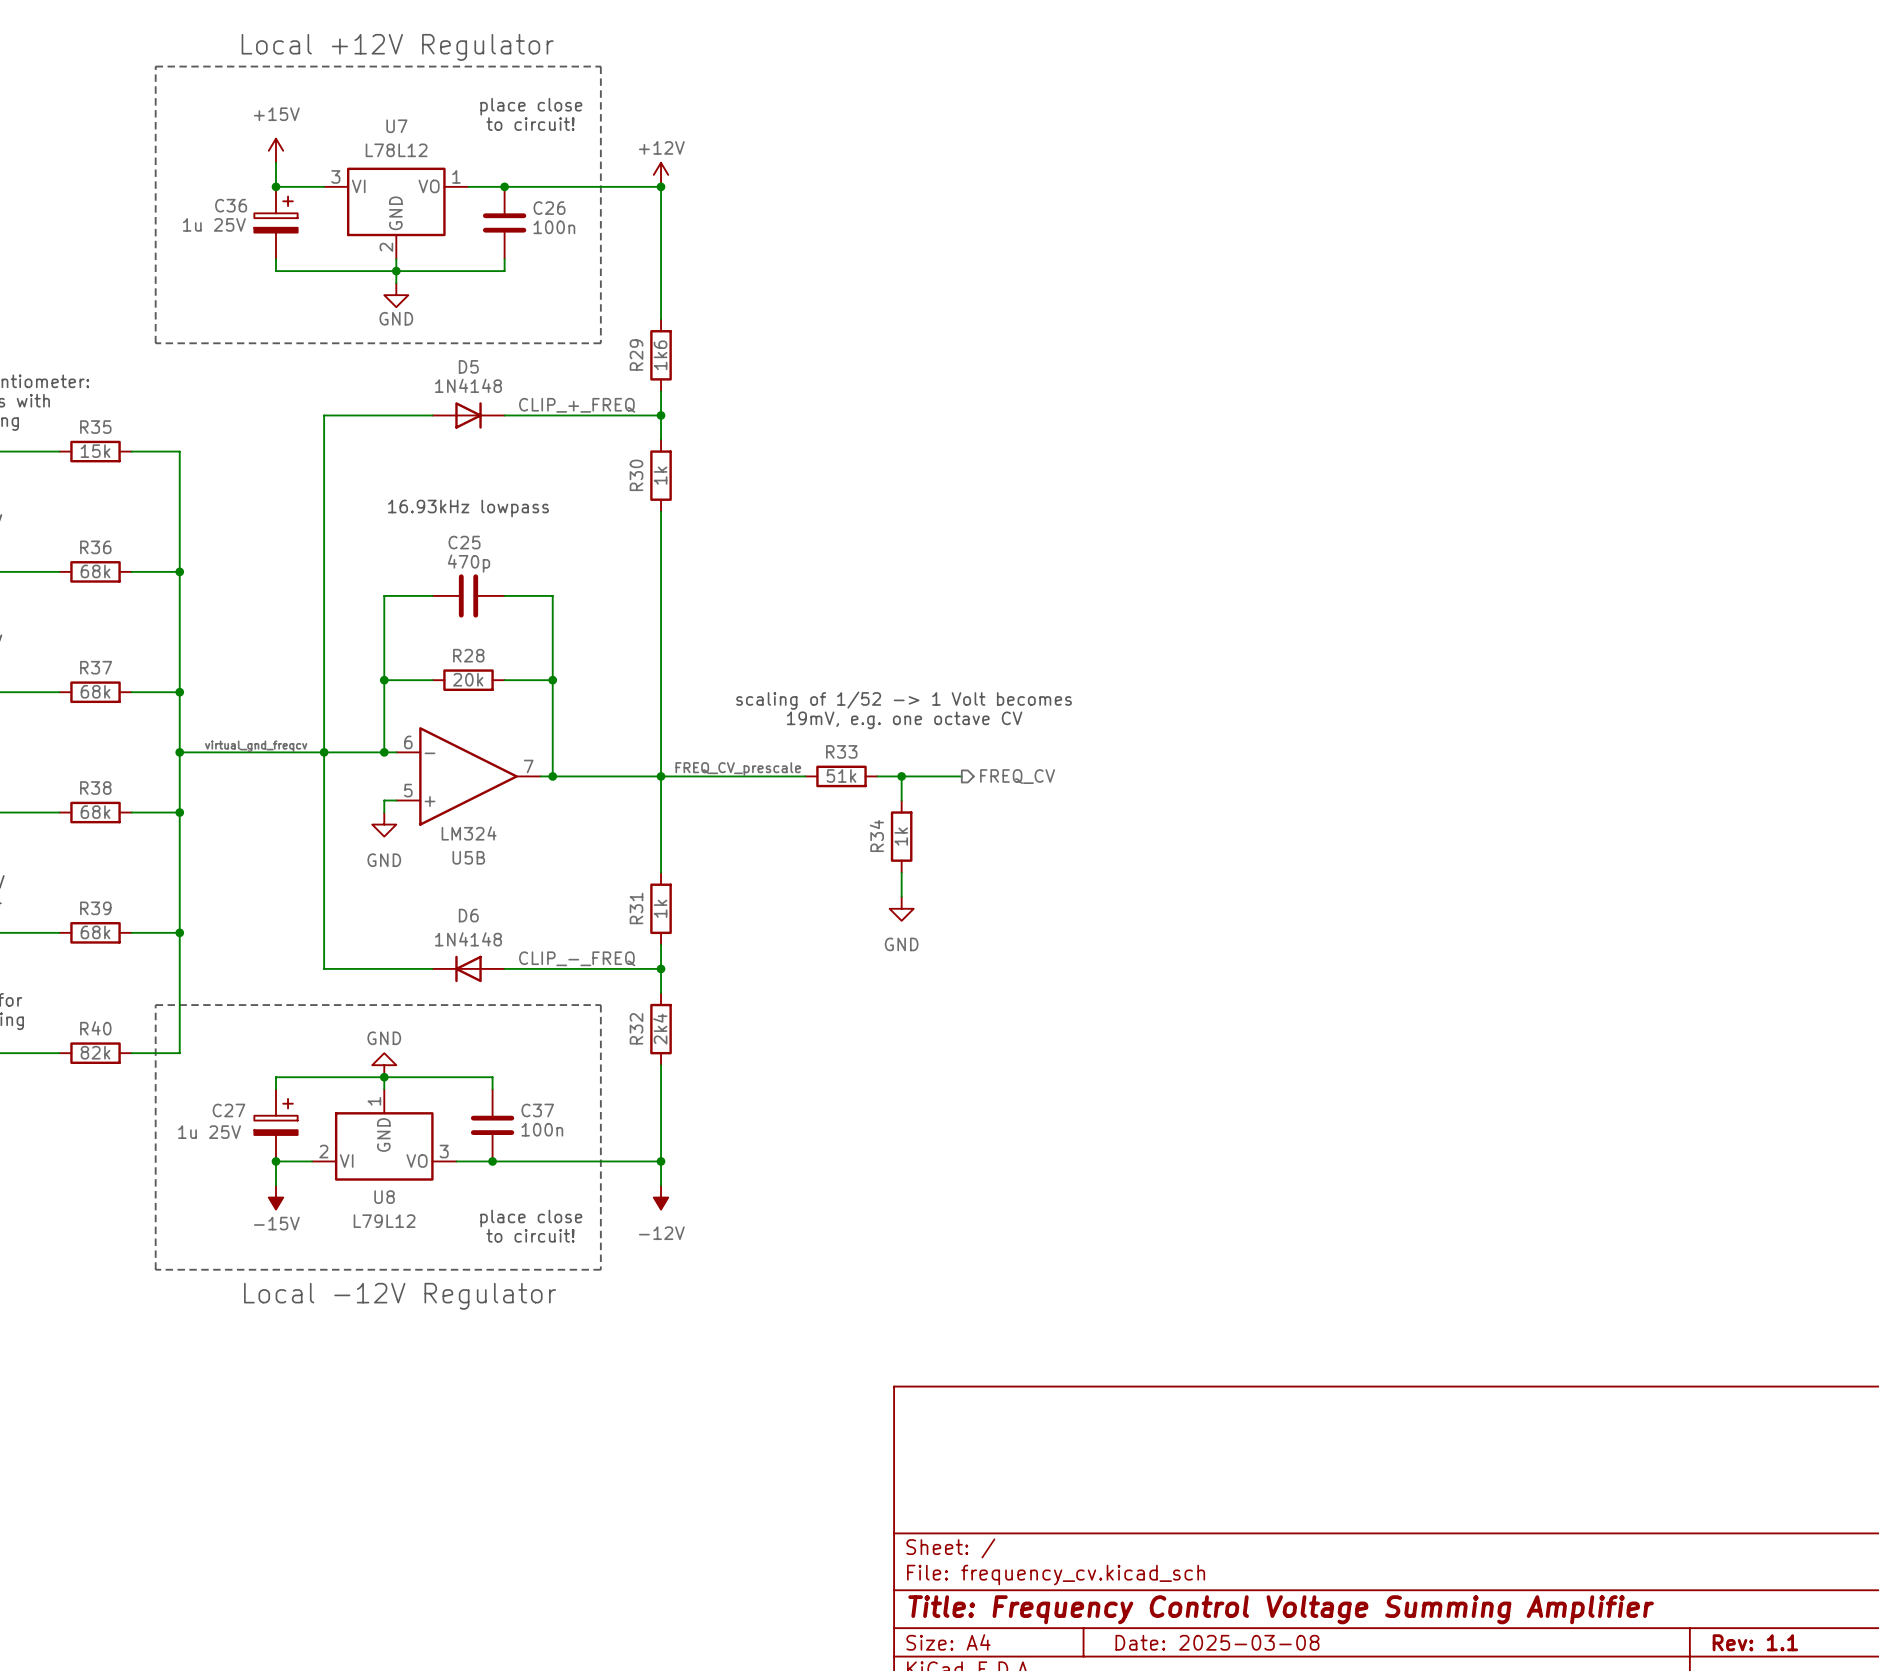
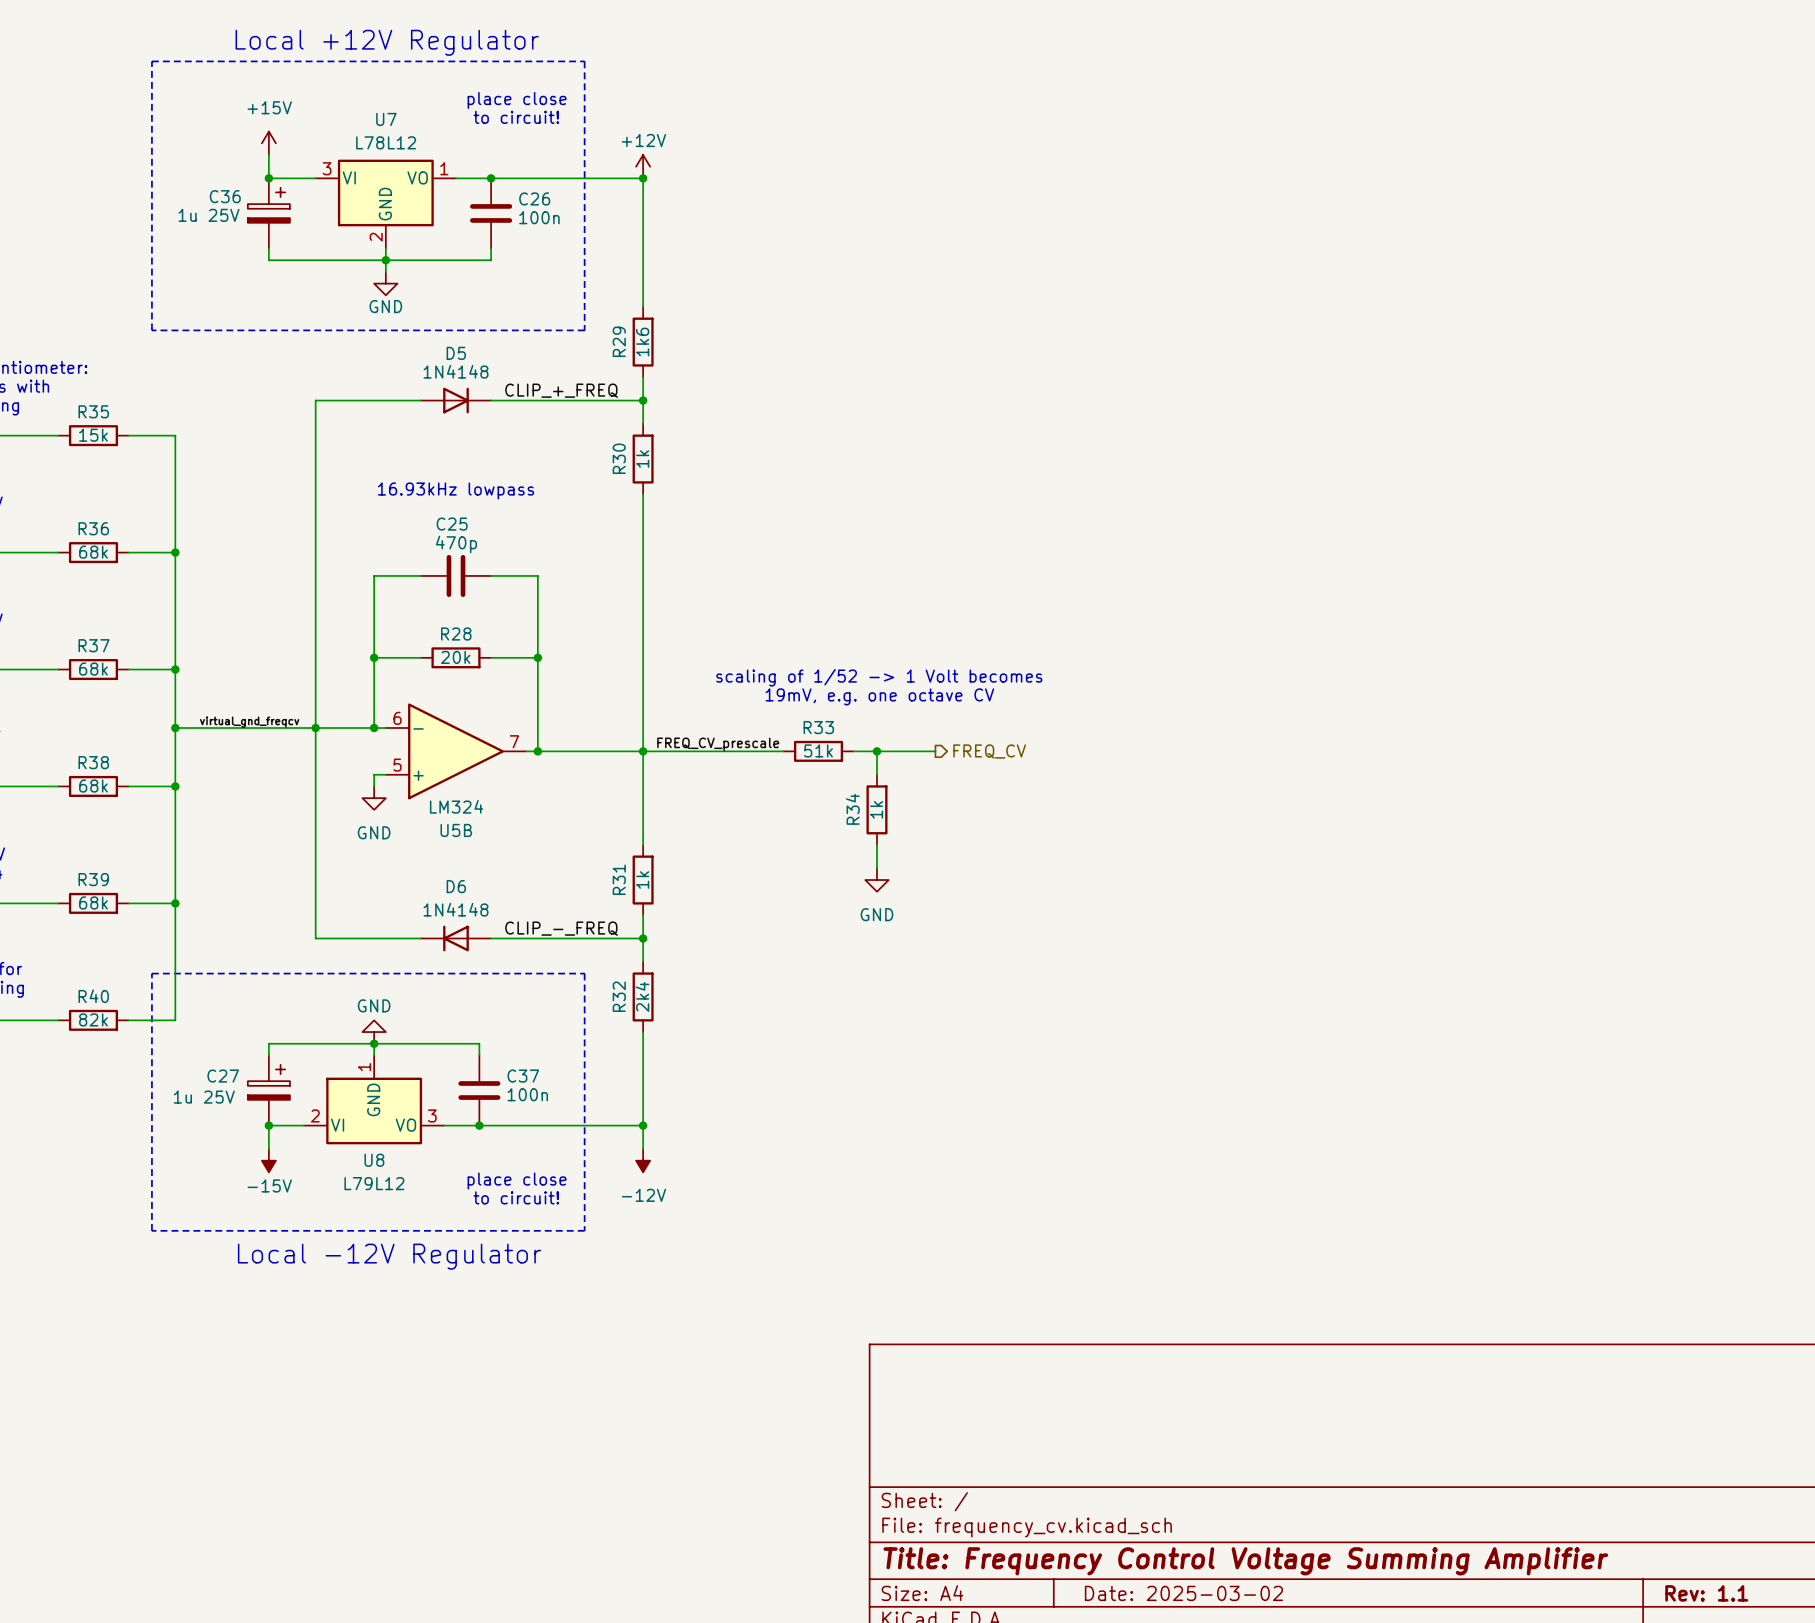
title block: Date: 2025-03-08 (1217, 1642) -> Date: 2025-03-02 (1183, 1593)

